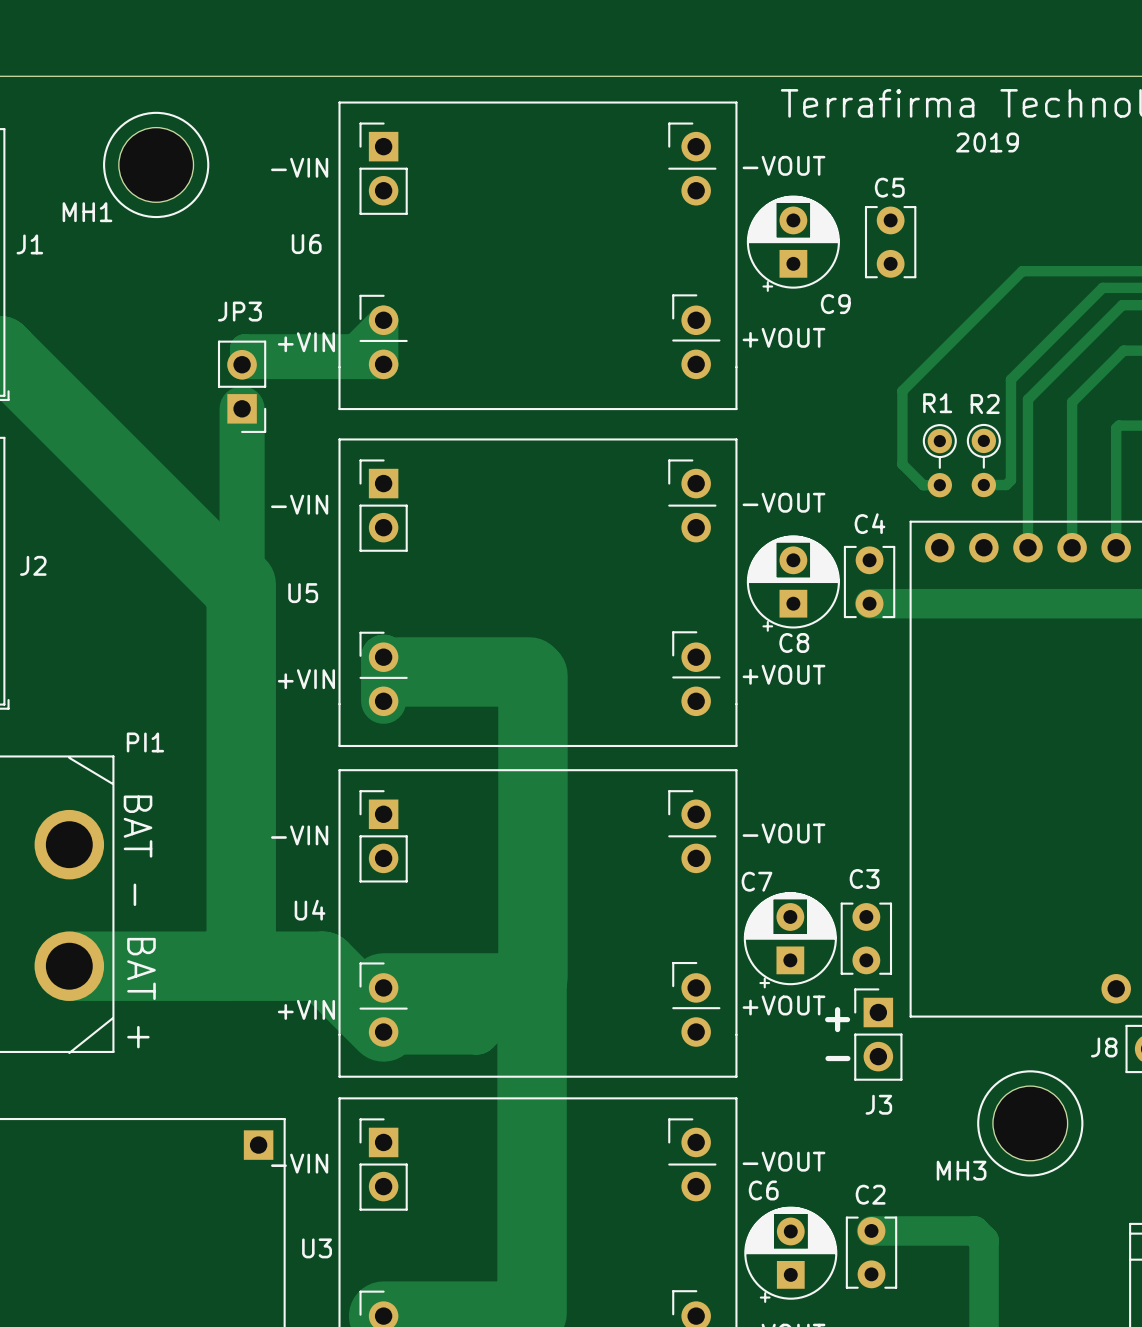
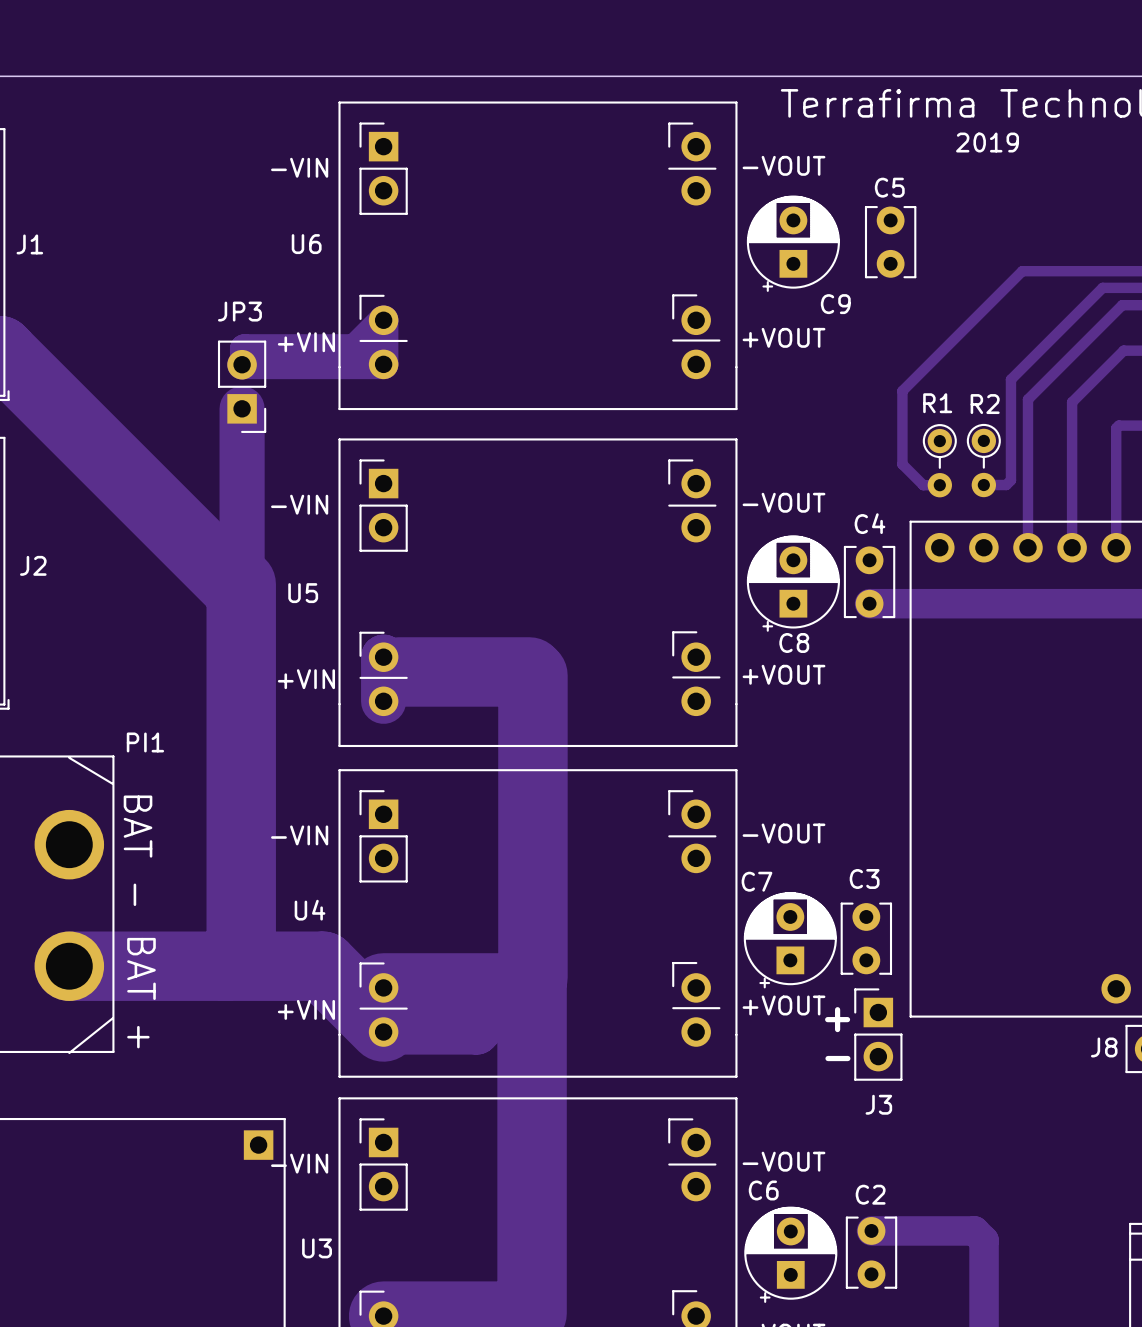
MH1: (156, 164) -> none
MH3: (1030, 1123) -> none

